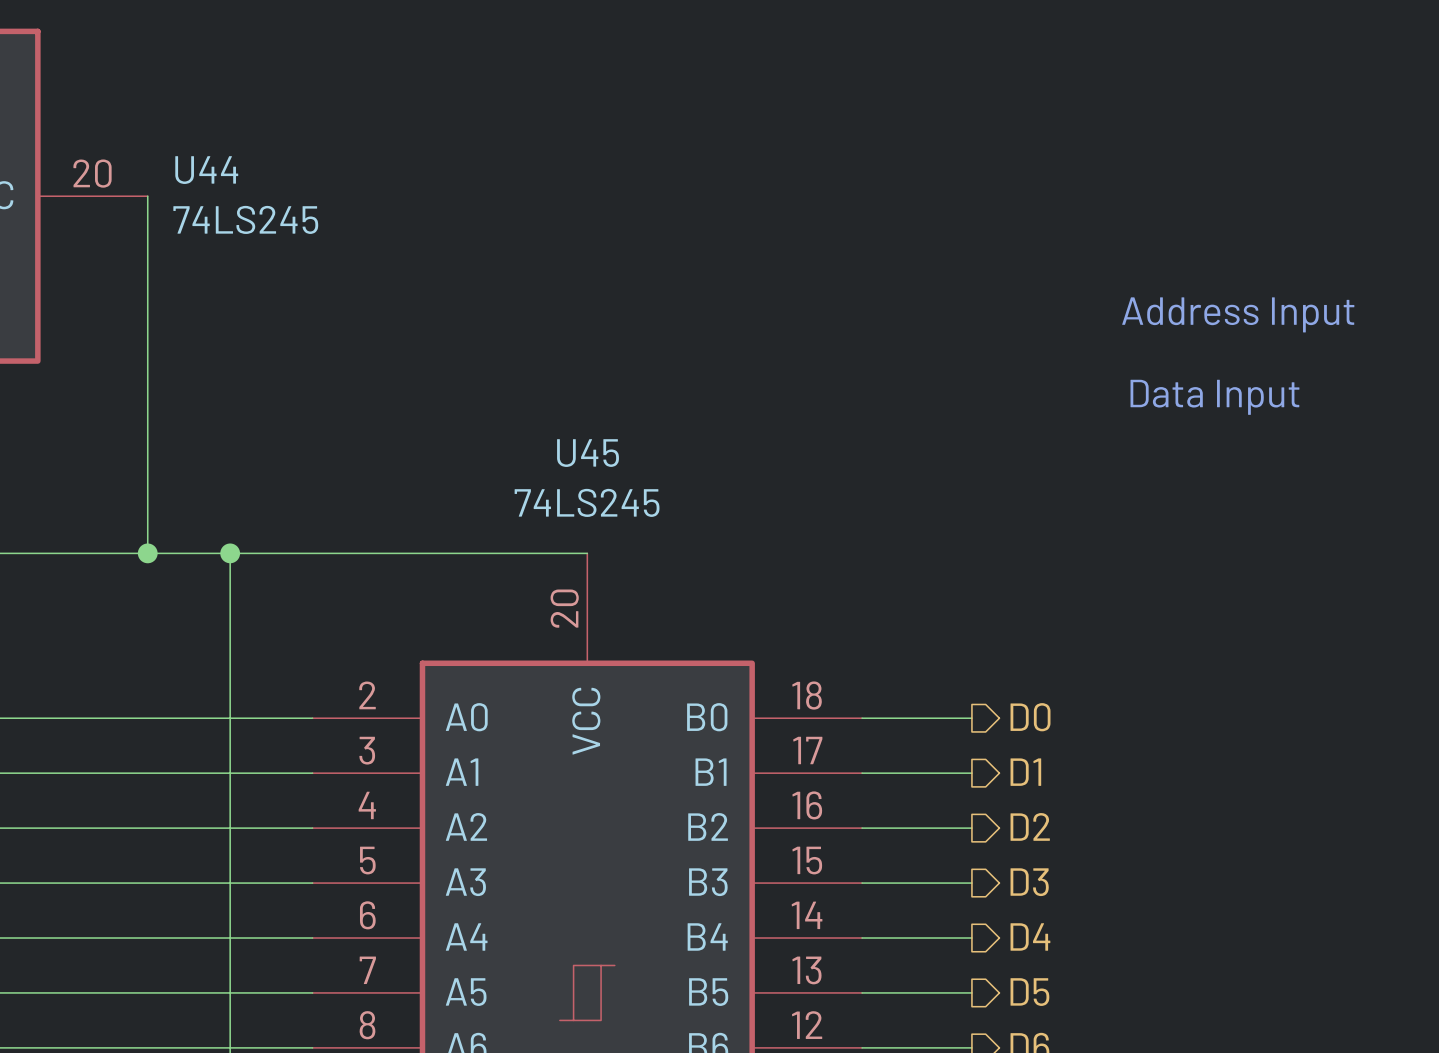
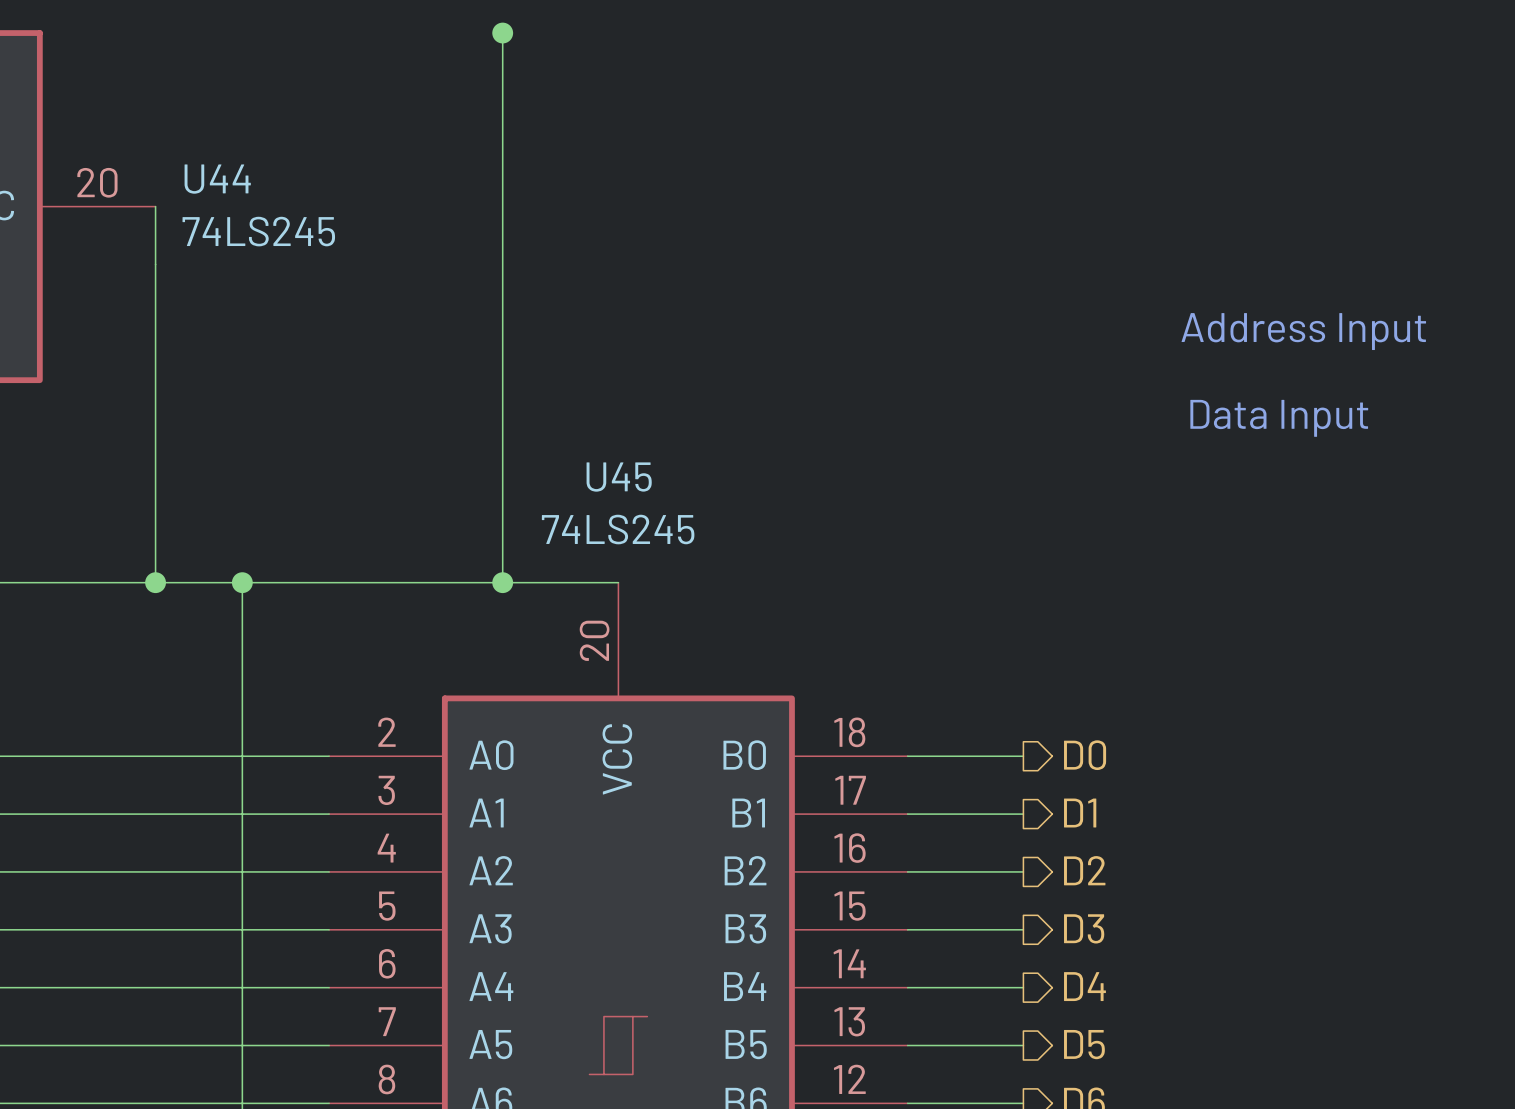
wire: none -> (502, 33) (502, 582)
junction: none -> (502, 33)
junction: none -> (502, 582)

